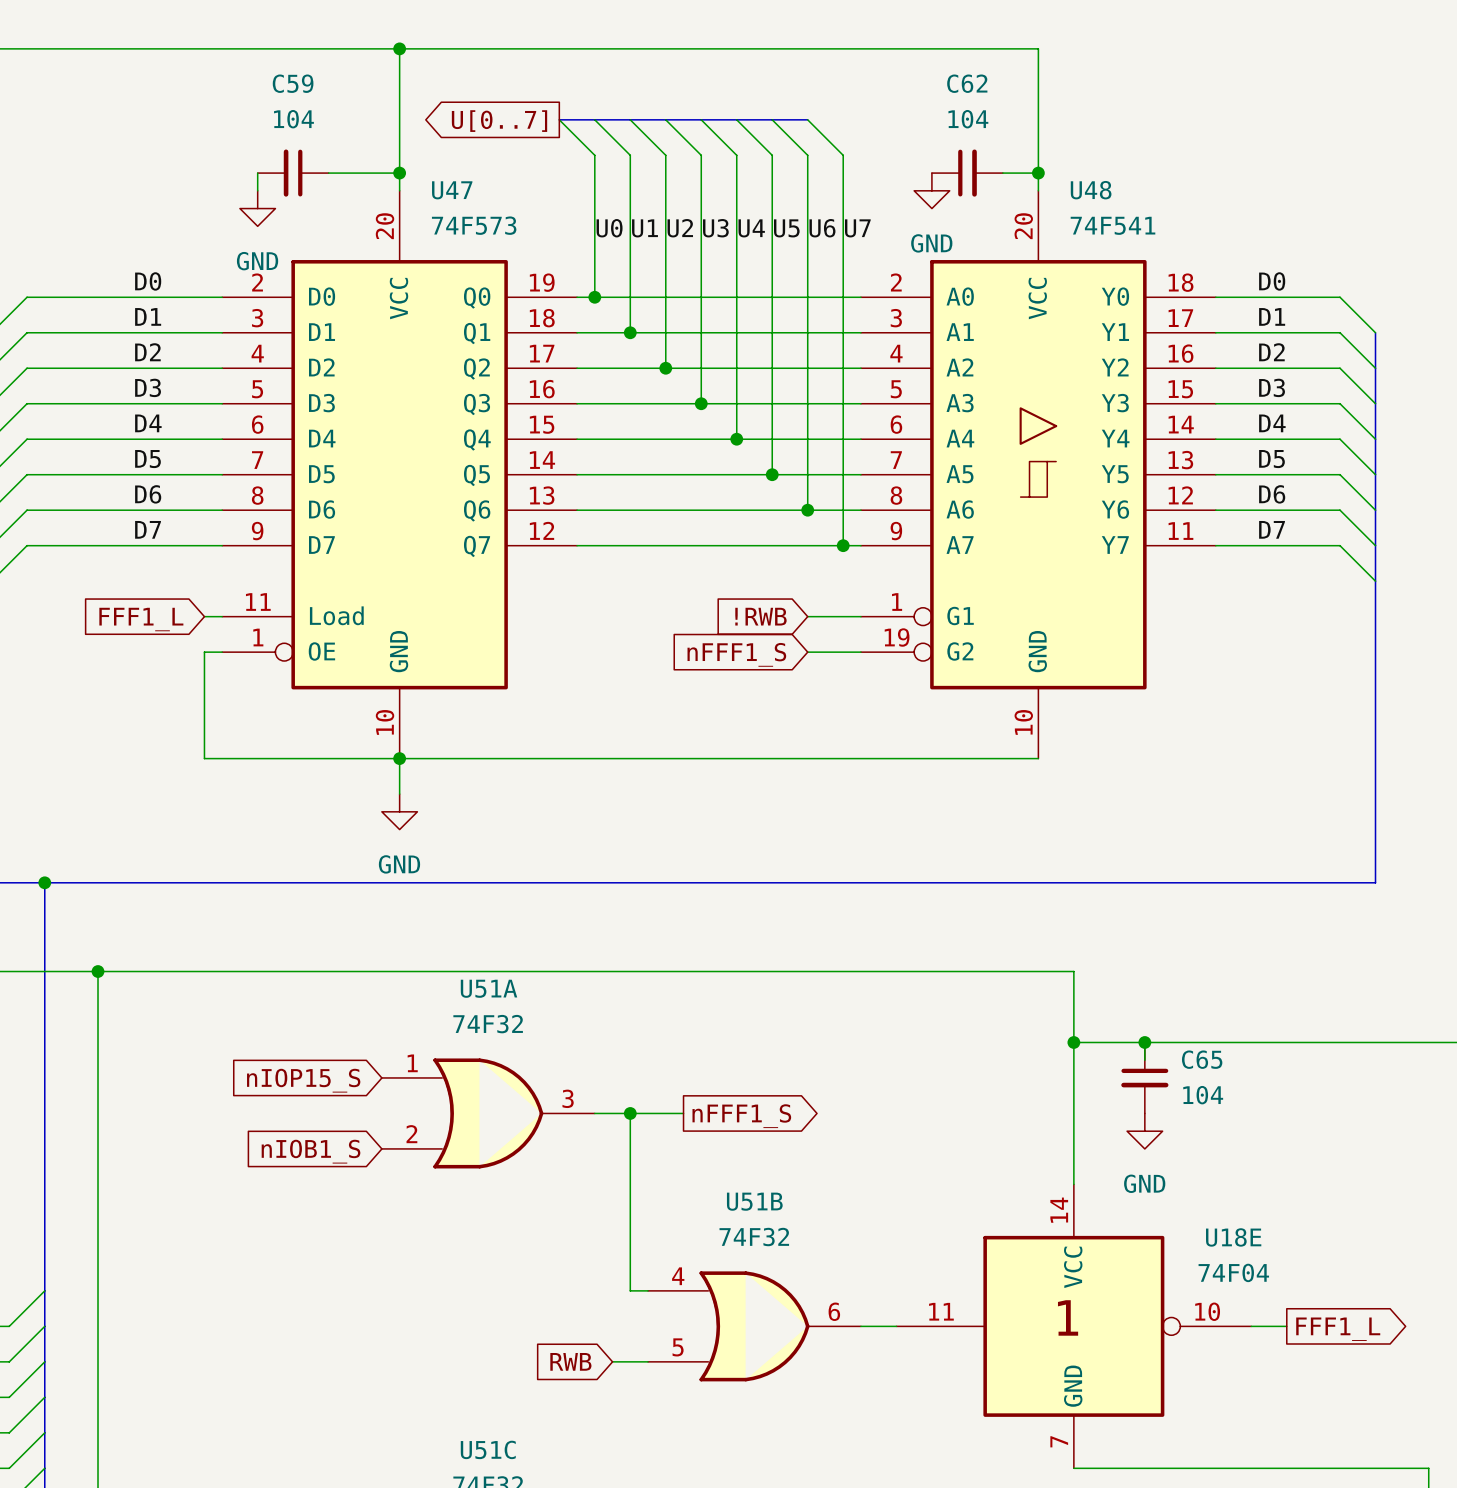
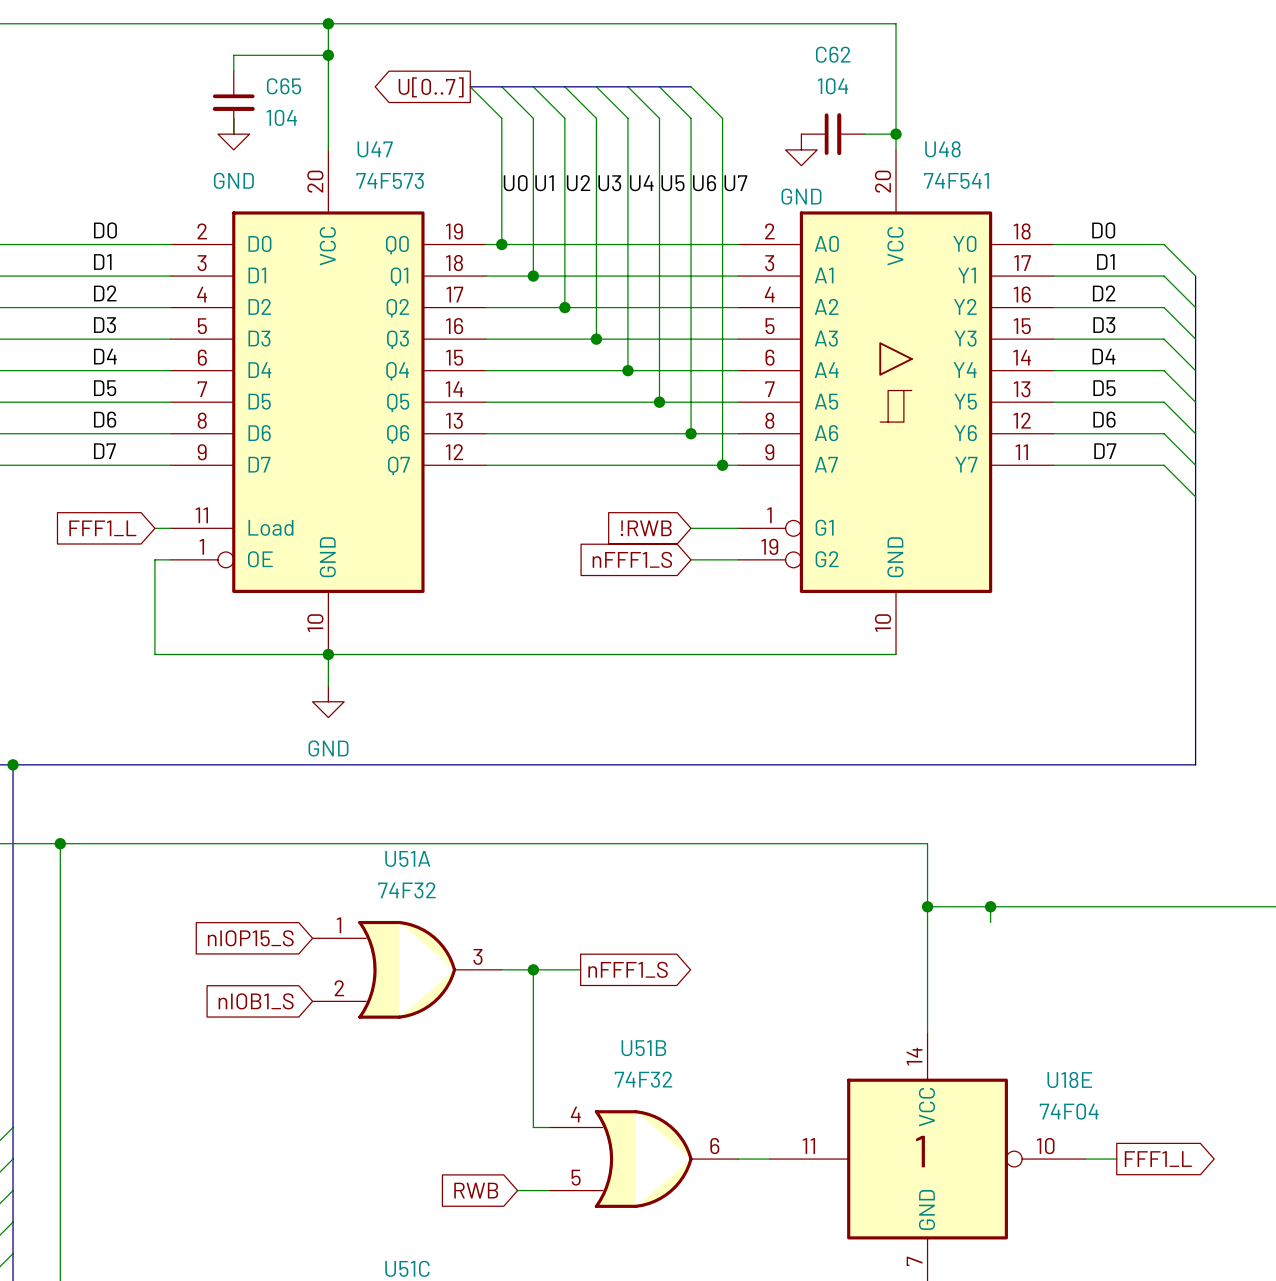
wire: none -> (328, 55) (233, 55) (233, 71)
junction: none -> (328, 55)
wire: (257, 173) (257, 190) -> (233, 118) (233, 134)
C59: 104 (293, 173) -> none
wire: (328, 173) (399, 173) -> none
junction: (399, 173) -> none
power symbol position: GND (257, 208) -> GND (233, 134)
C65 position: (1144, 1077) -> (233, 102)
power symbol: GND (1144, 1131) -> none

